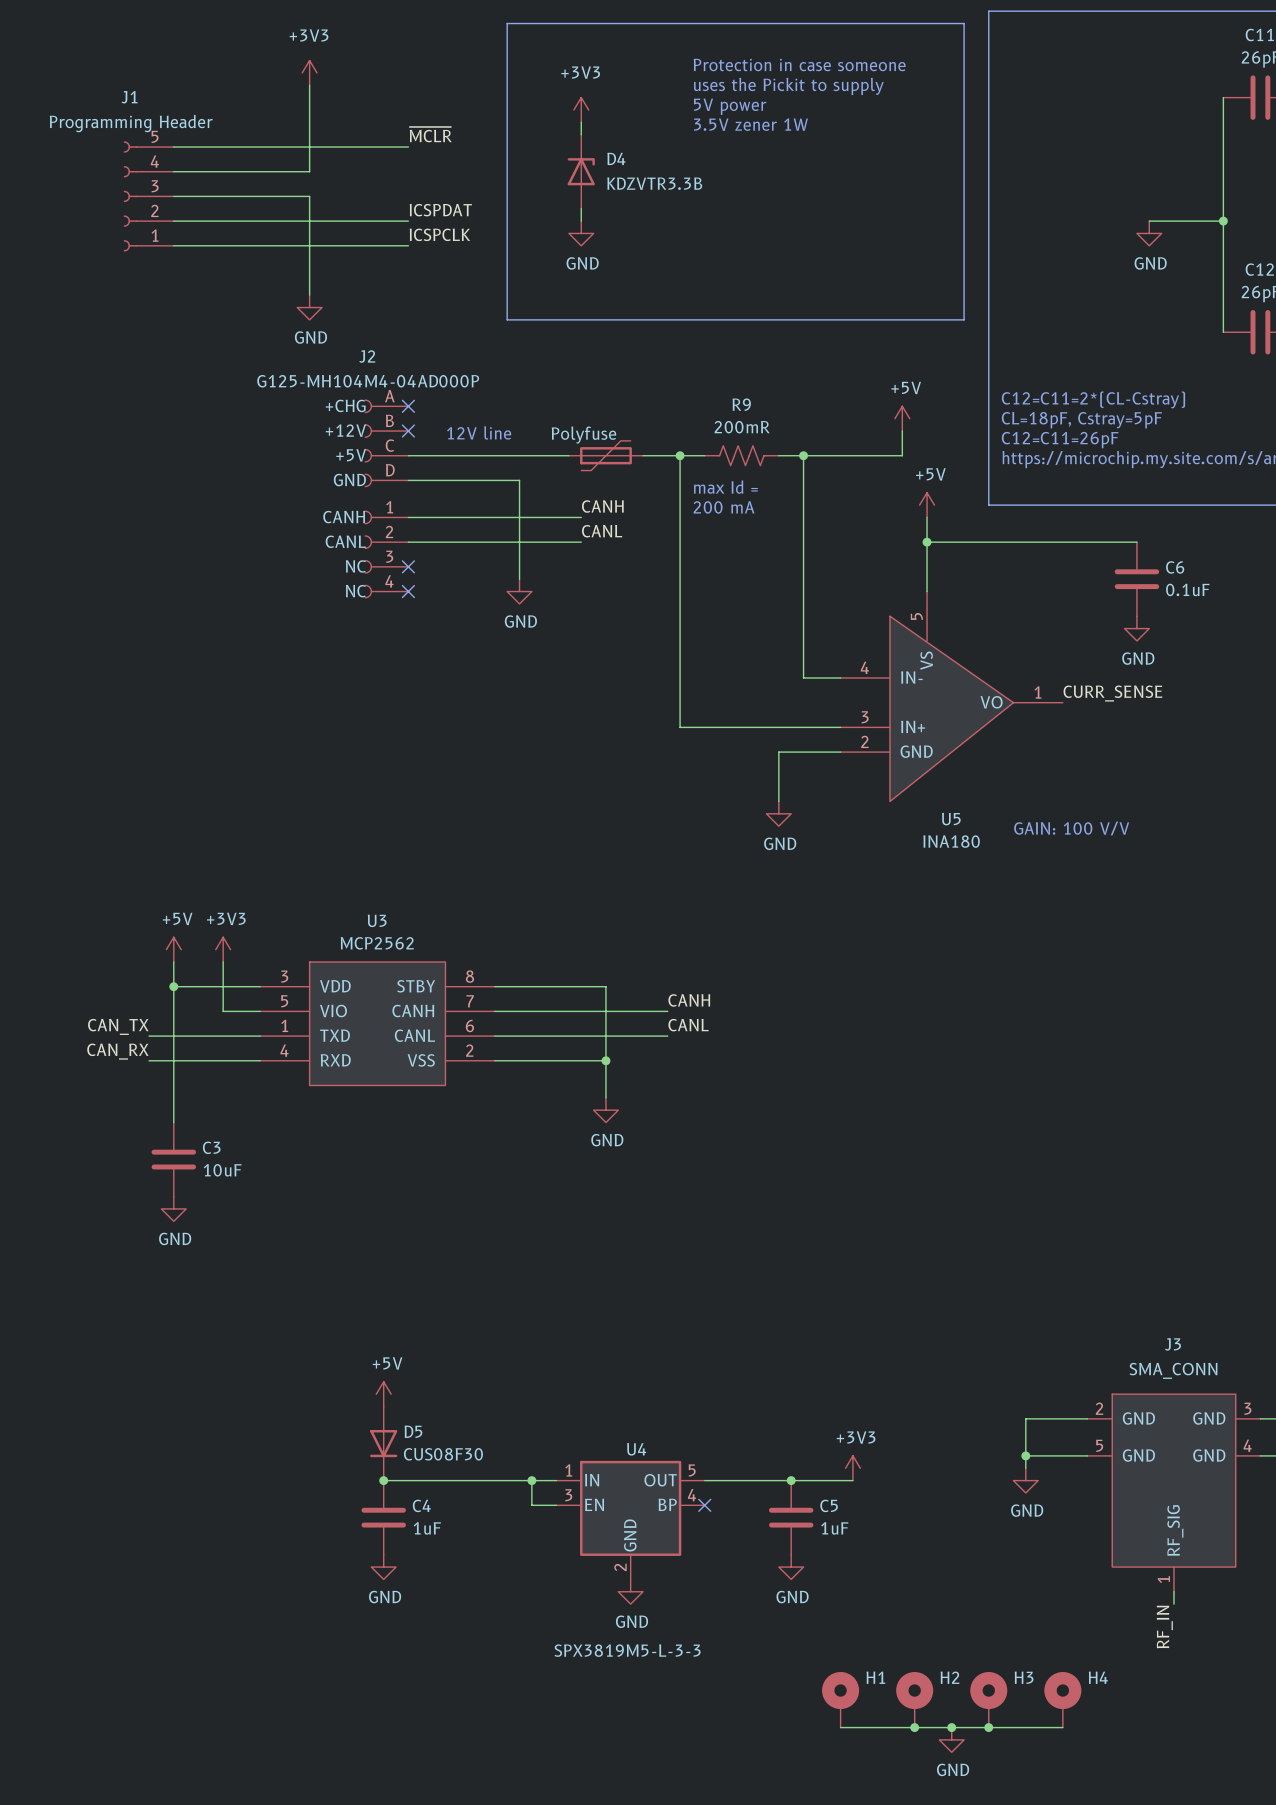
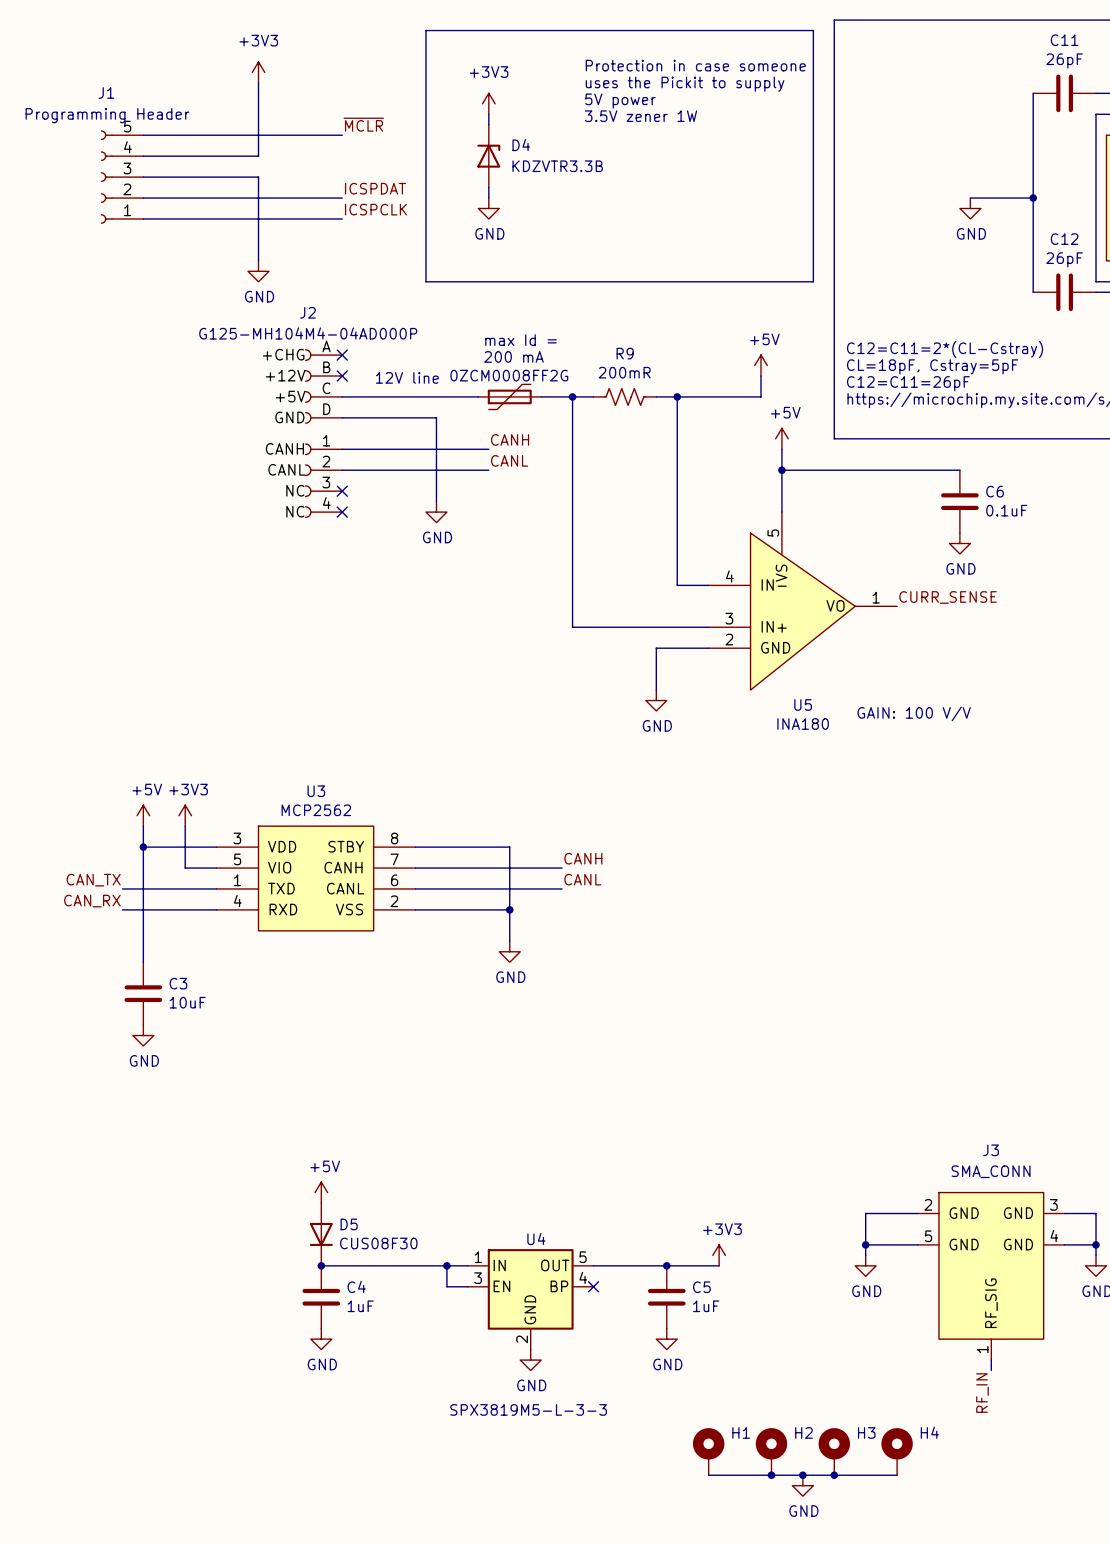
part value: Polyfuse (583, 435) -> 0ZCM0008FF2G (509, 375)
text position: max Id = (725, 487) -> max Id = (521, 340)
text position: 200 mA (724, 507) -> 200 mA (514, 356)

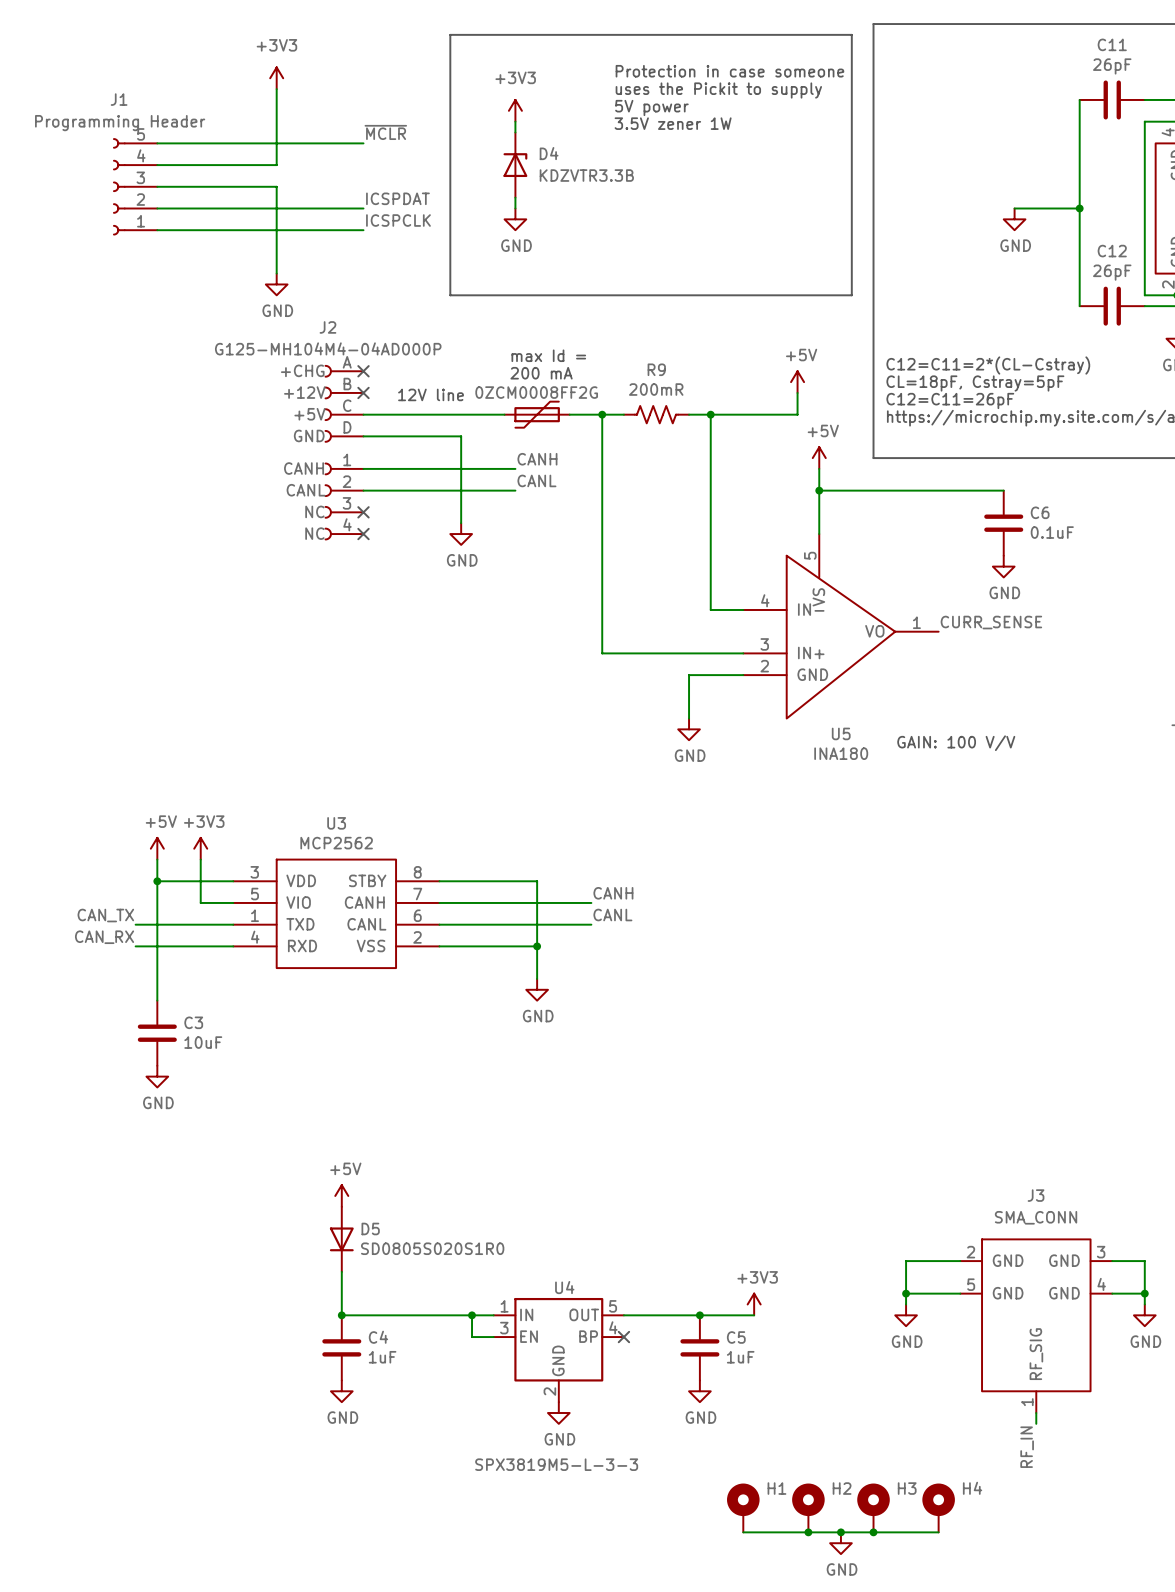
power symbol position: +5V (321, 1192) -> +5V (341, 1195)
D5 position: (321, 1234) -> (341, 1239)
D5 value: CUS08F30 (378, 1243) -> SD0805S020S1R0 (432, 1248)

